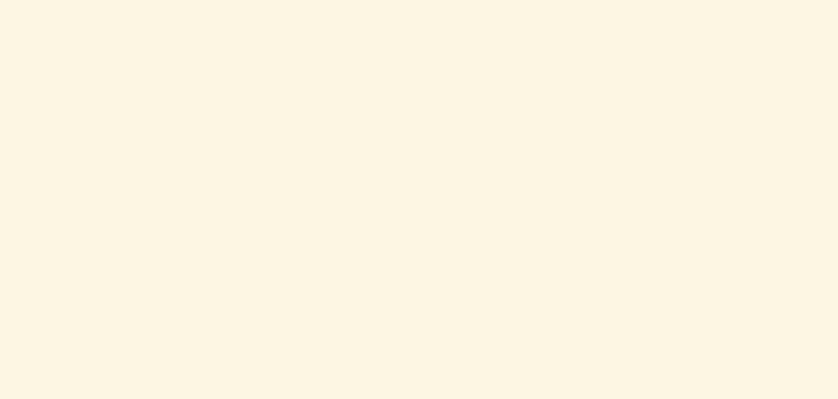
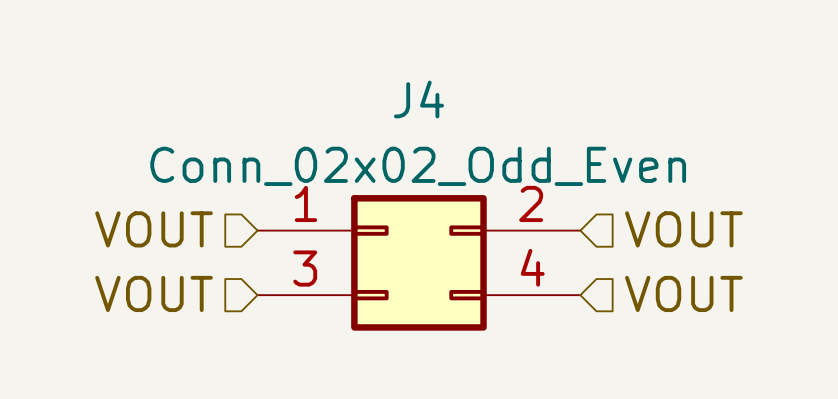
hierarchical label: none -> VOUT (154, 229)
hierarchical label: none -> VOUT (683, 229)
J4: none -> Conn_02x02_Odd_Even (418, 262)
hierarchical label: none -> VOUT (154, 293)
hierarchical label: none -> VOUT (683, 293)

